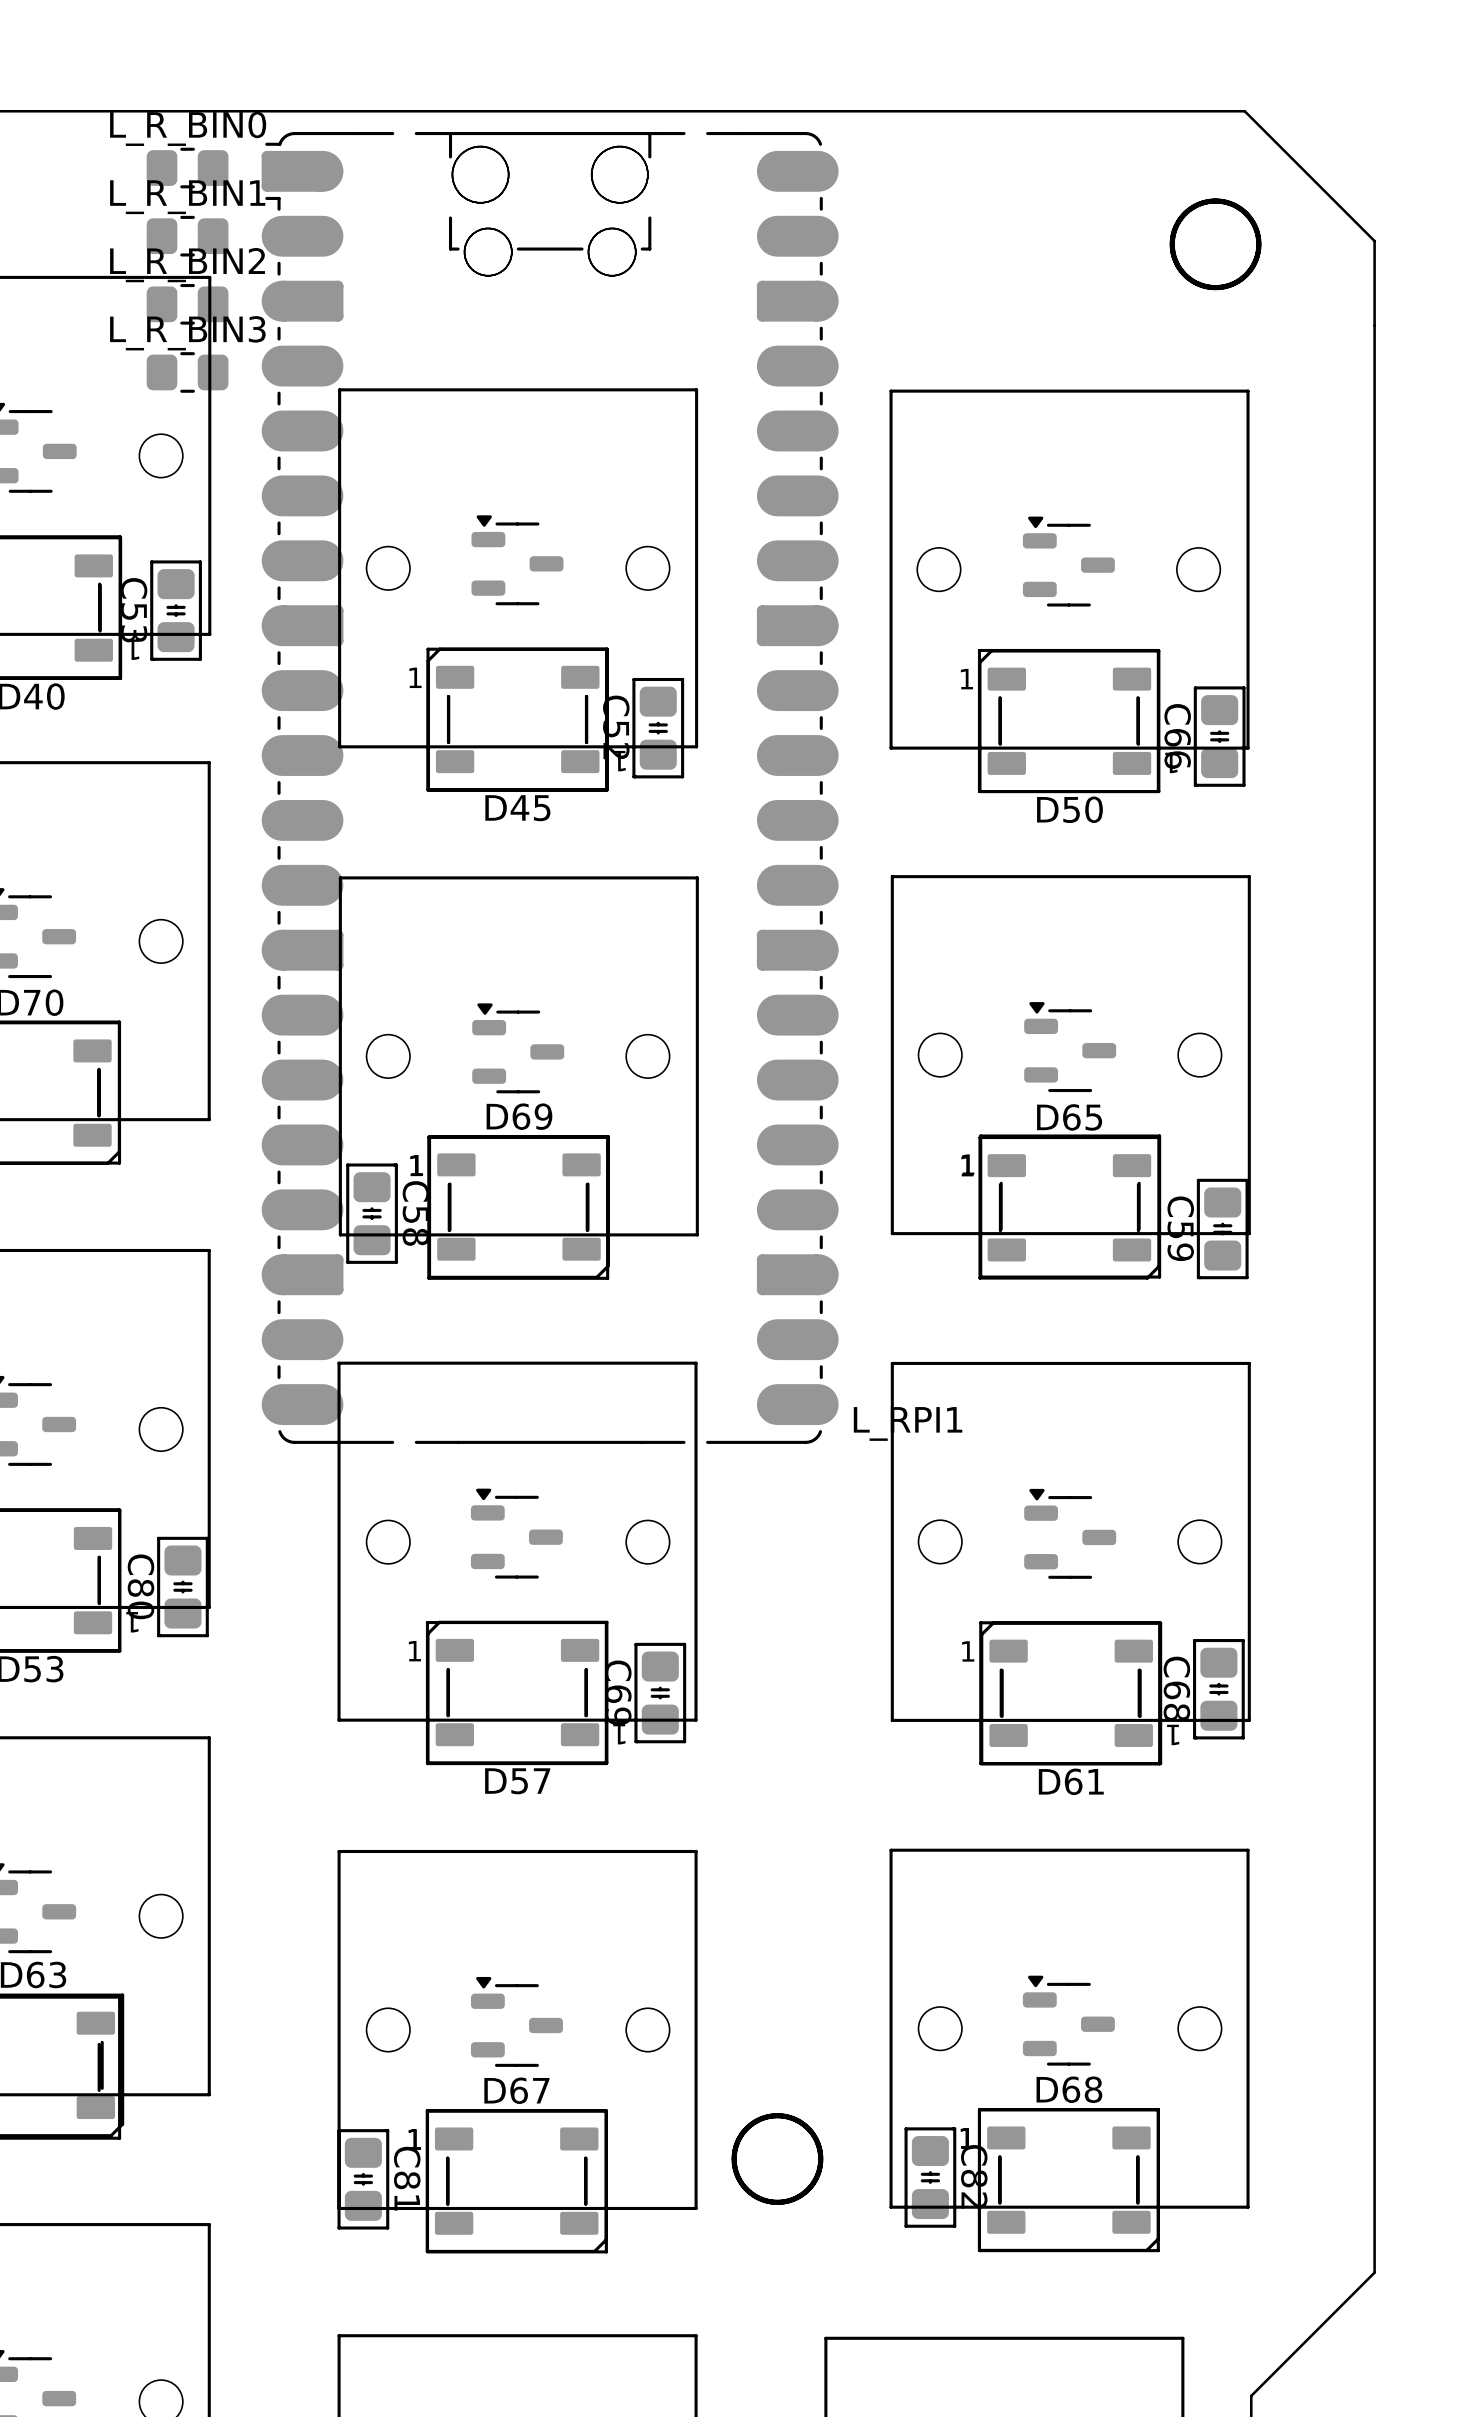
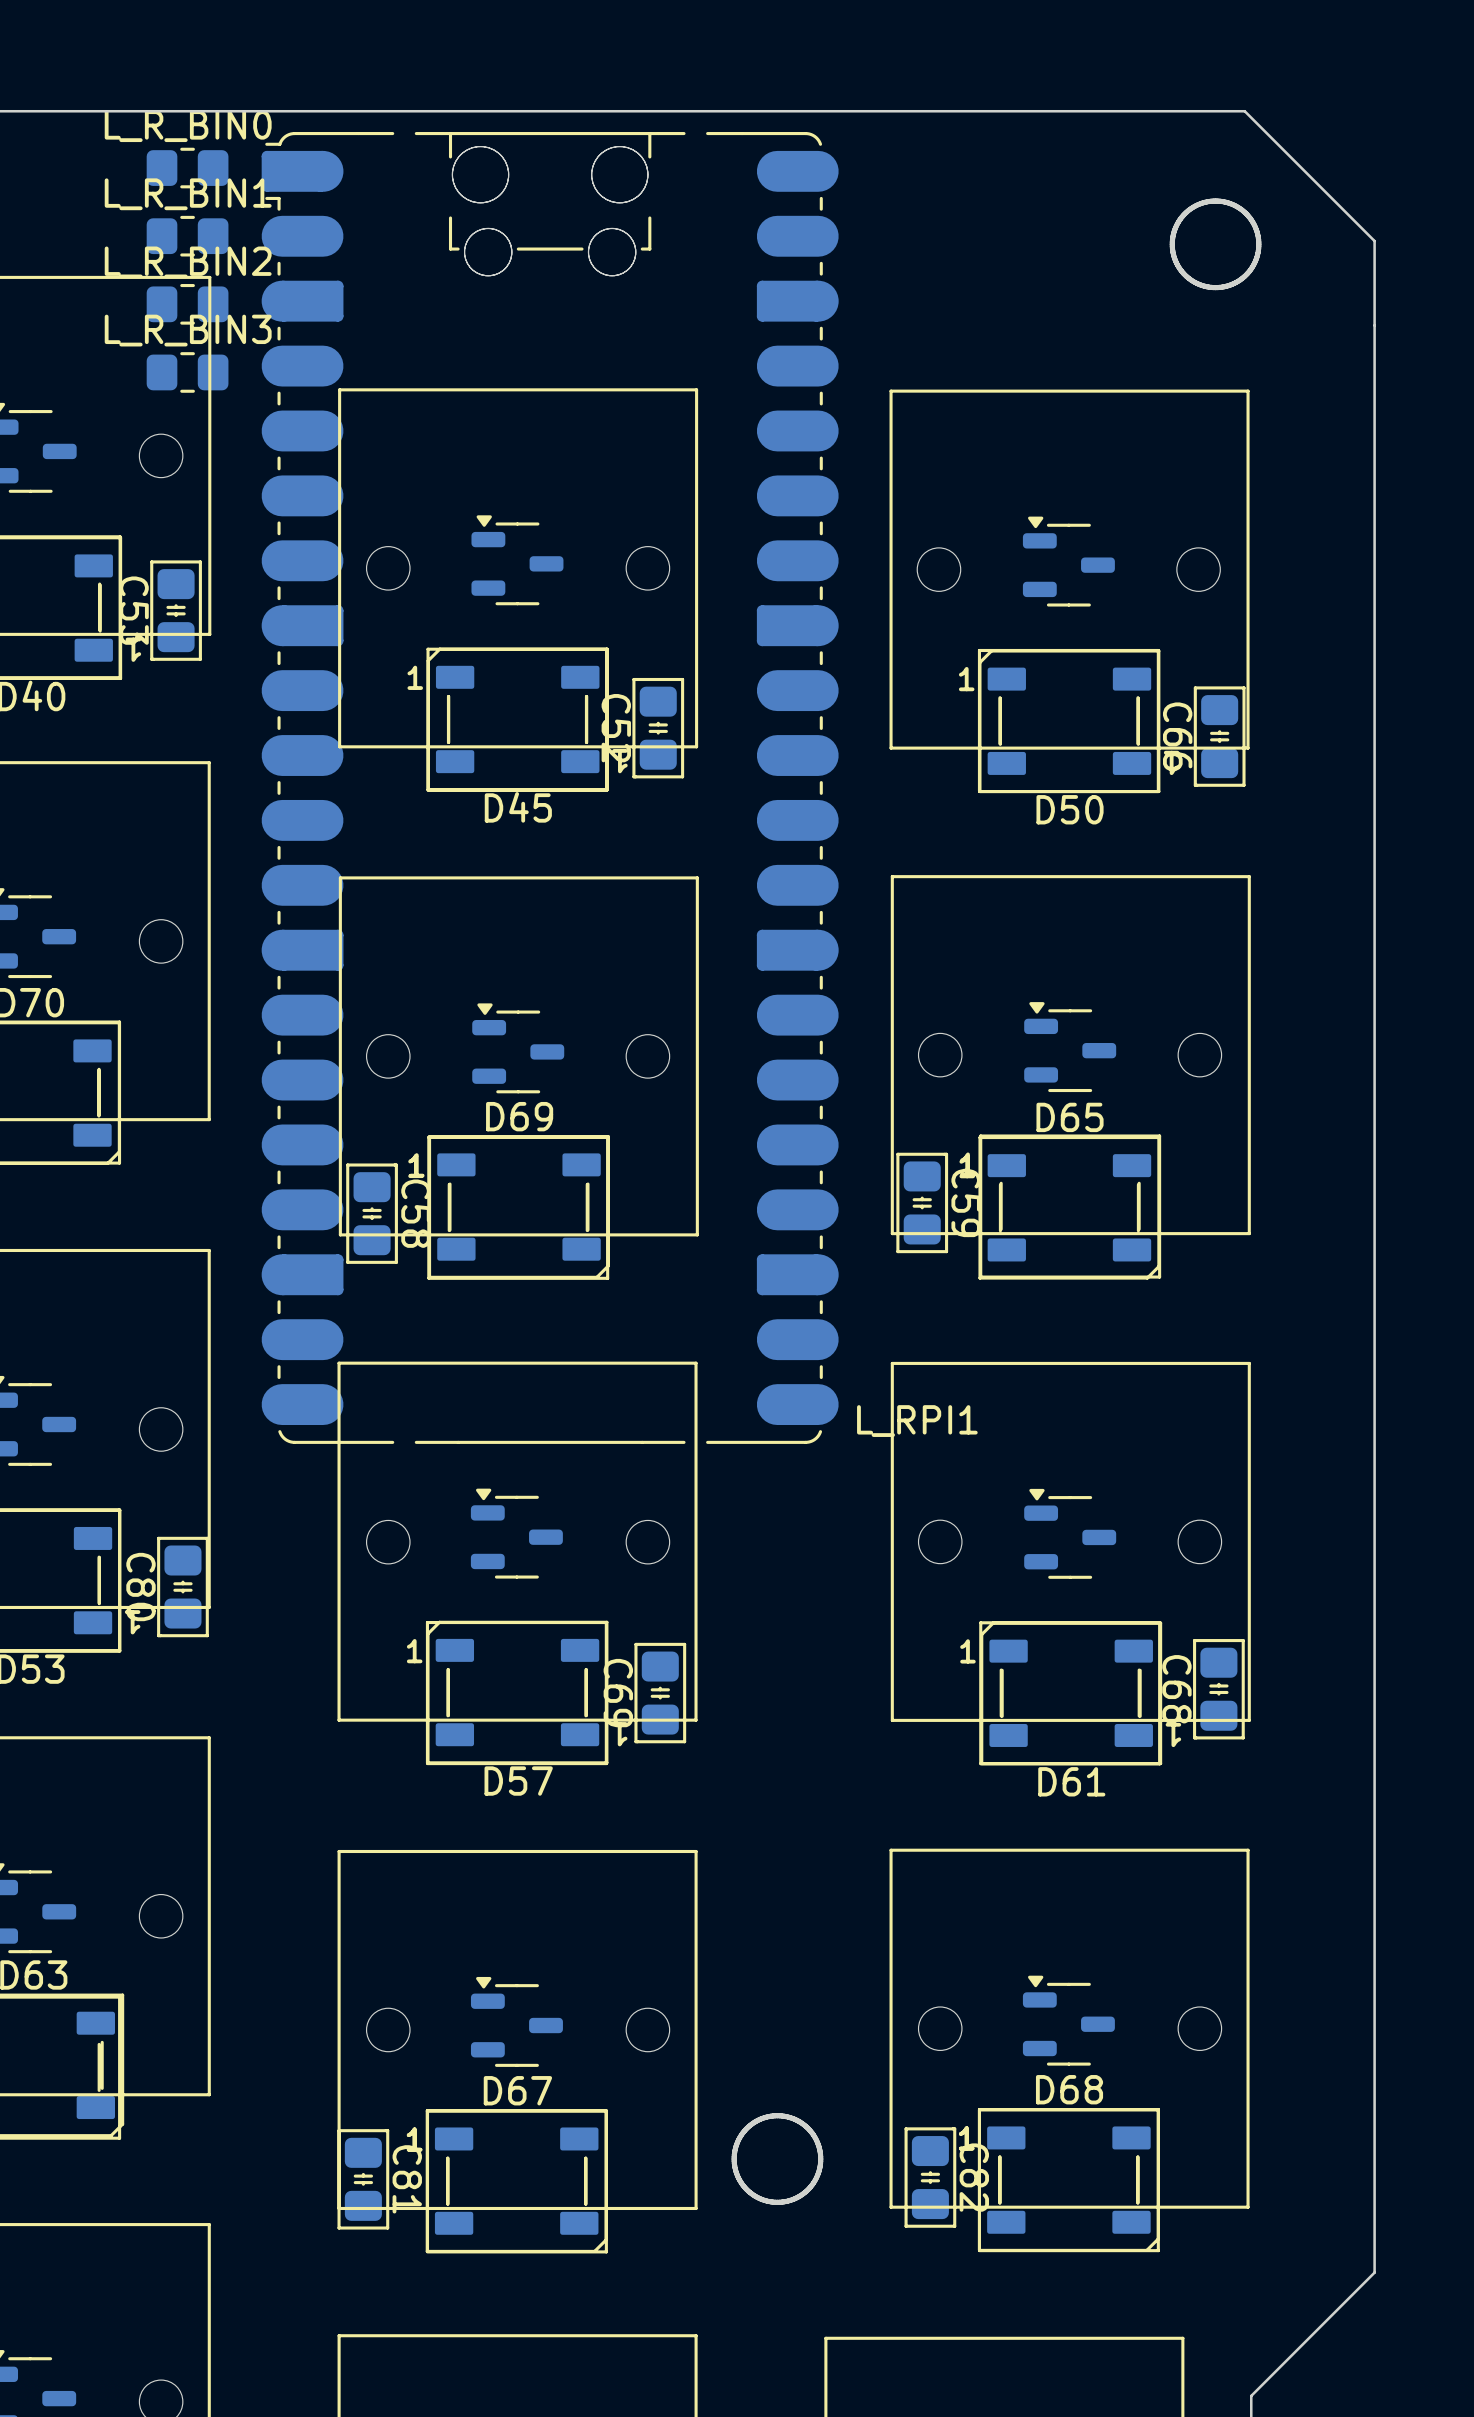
C59 rotation: 0° (1222, 1229) -> 180° (922, 1202)
C59 position: (1222, 1229) -> (922, 1202)

